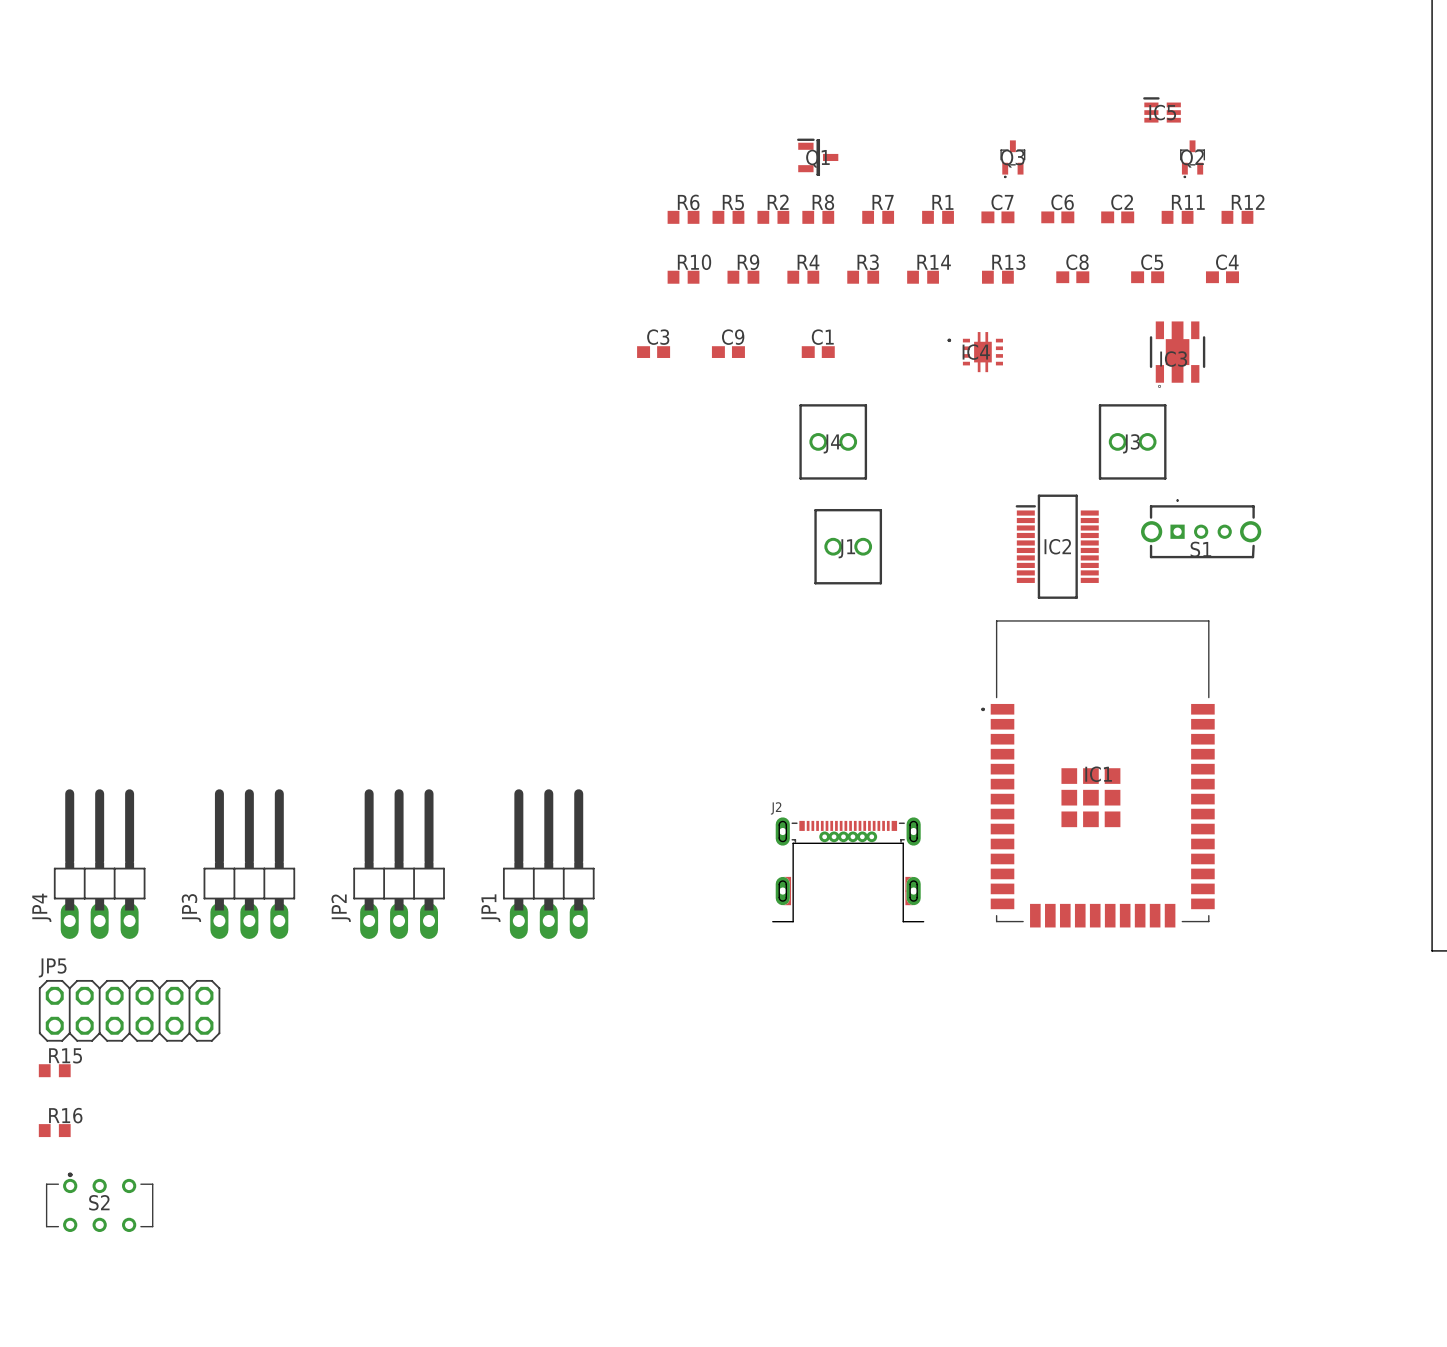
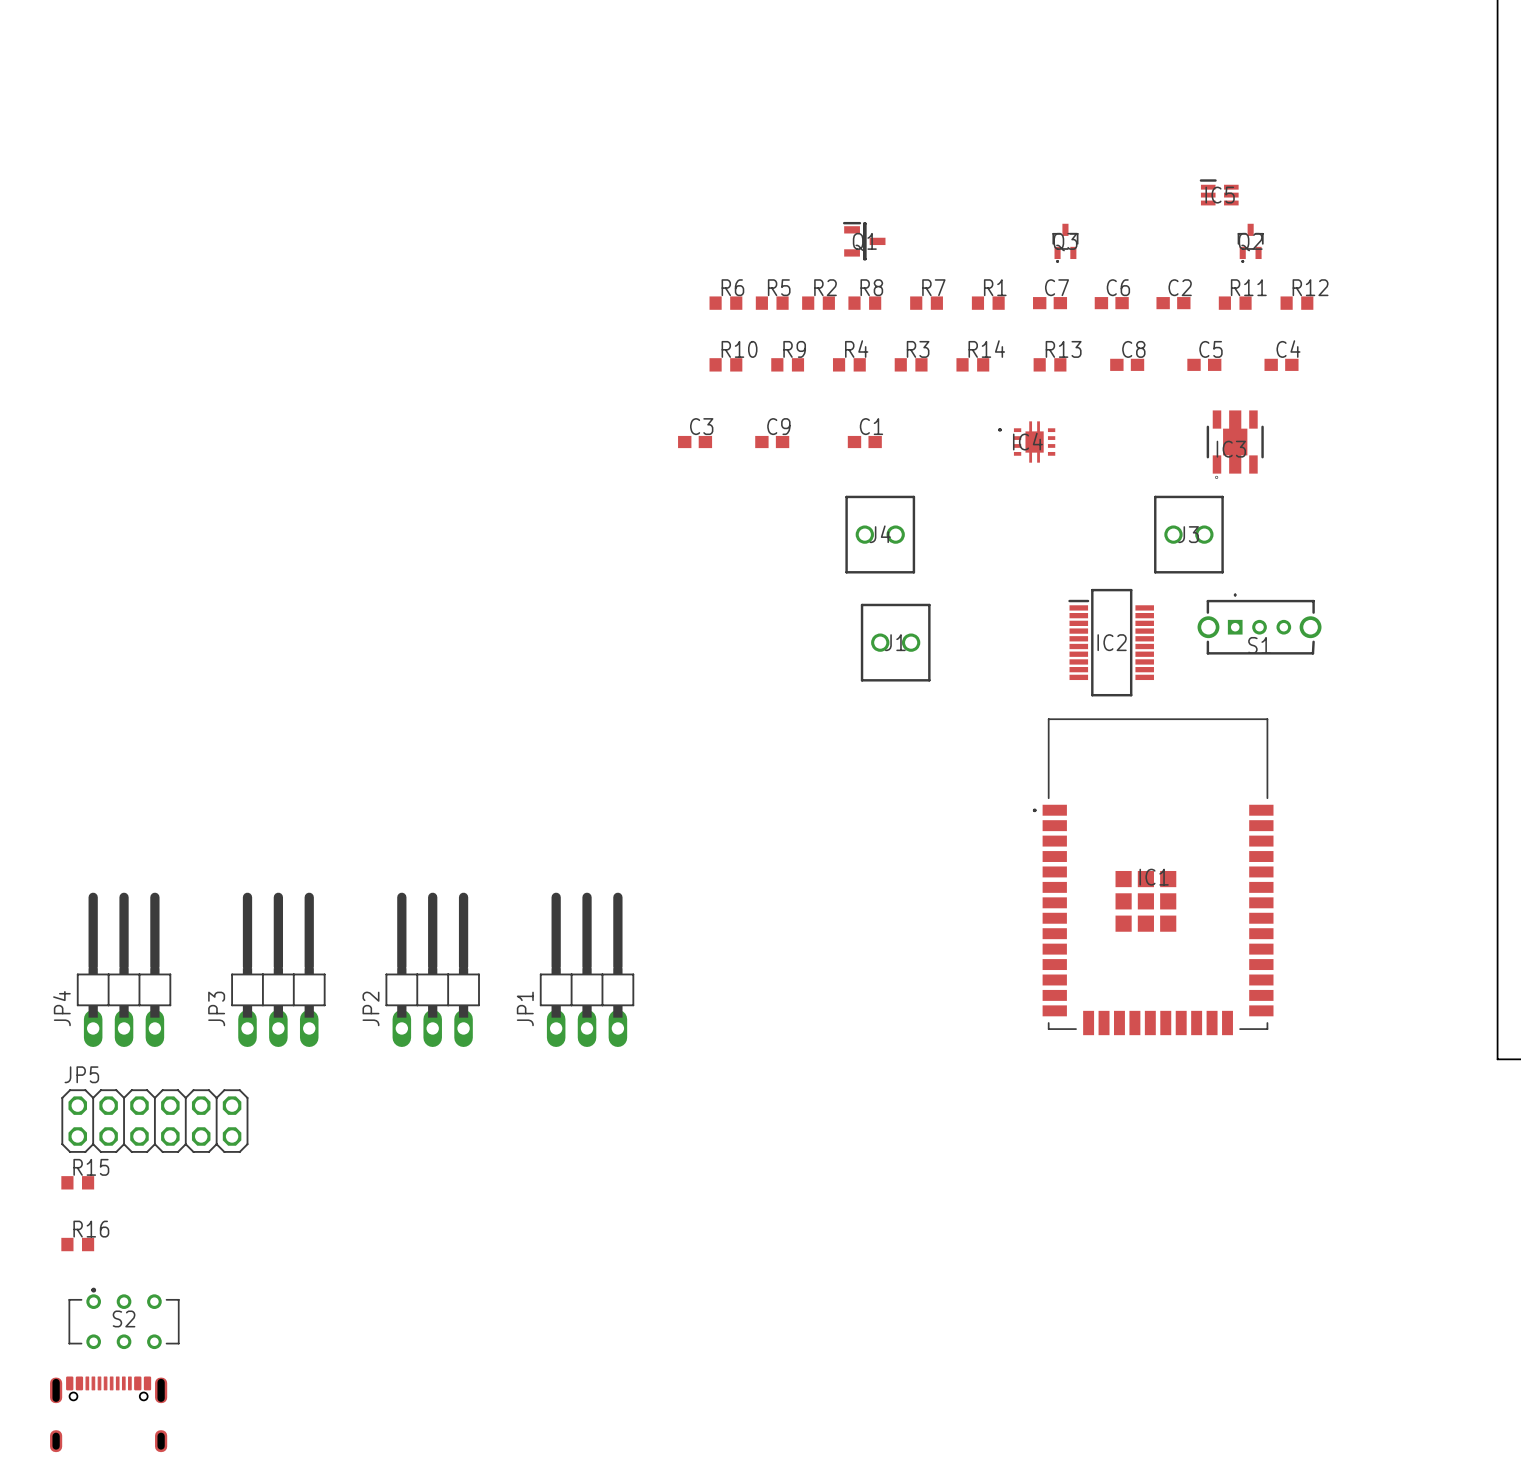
J2: (848, 869) -> none
part: none -> (108, 1414)

